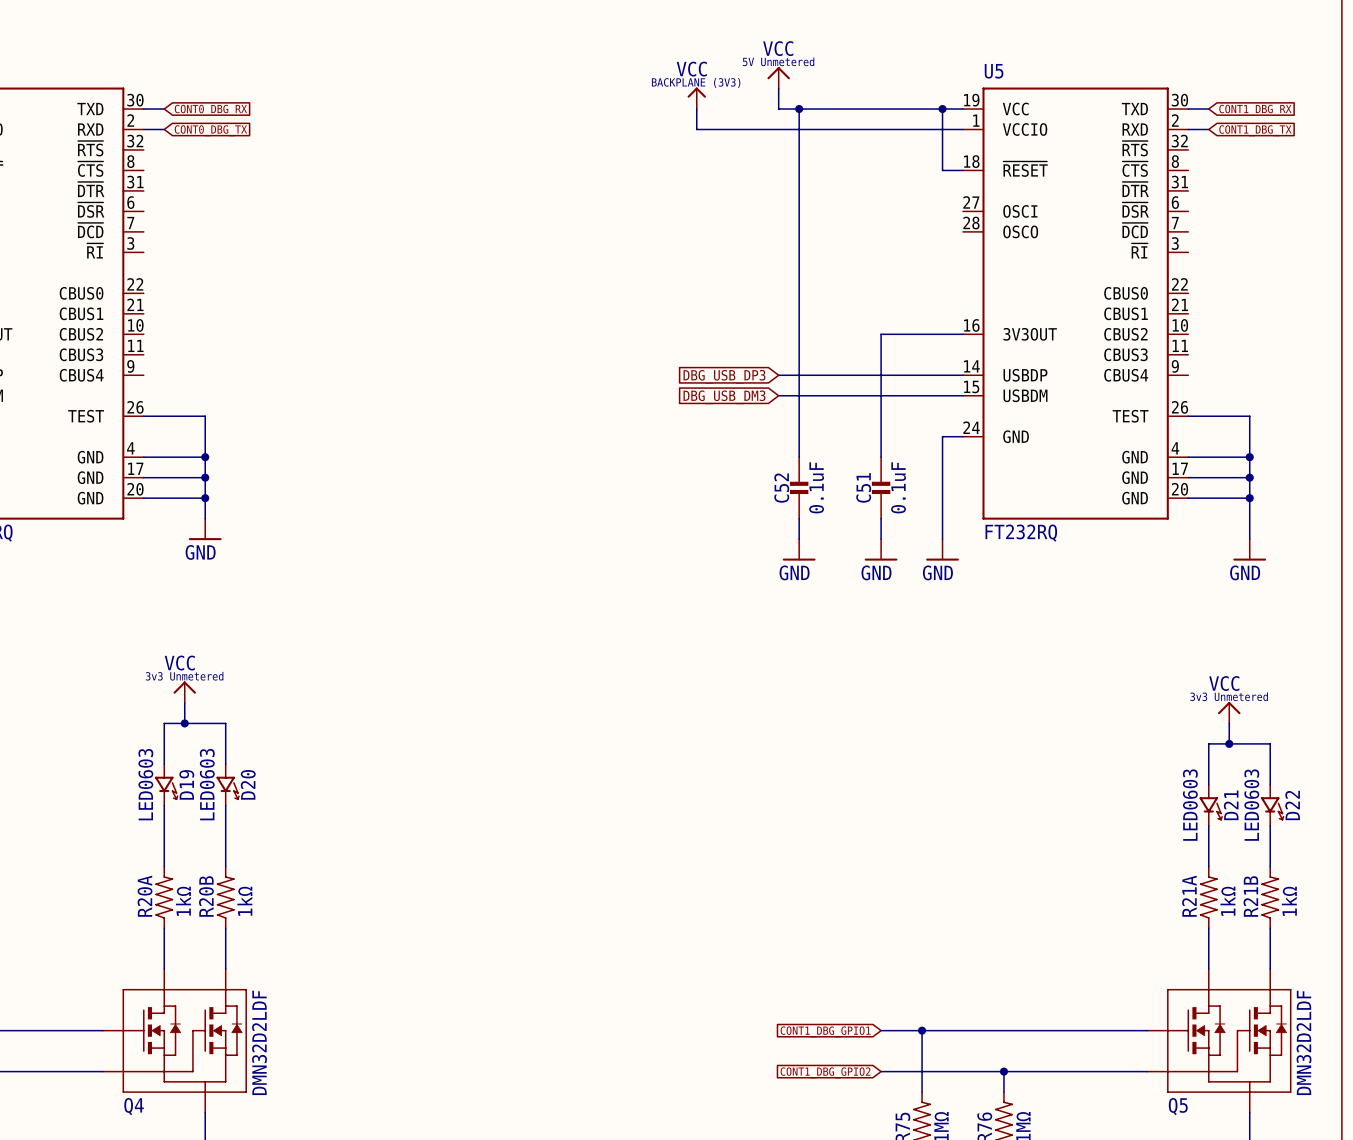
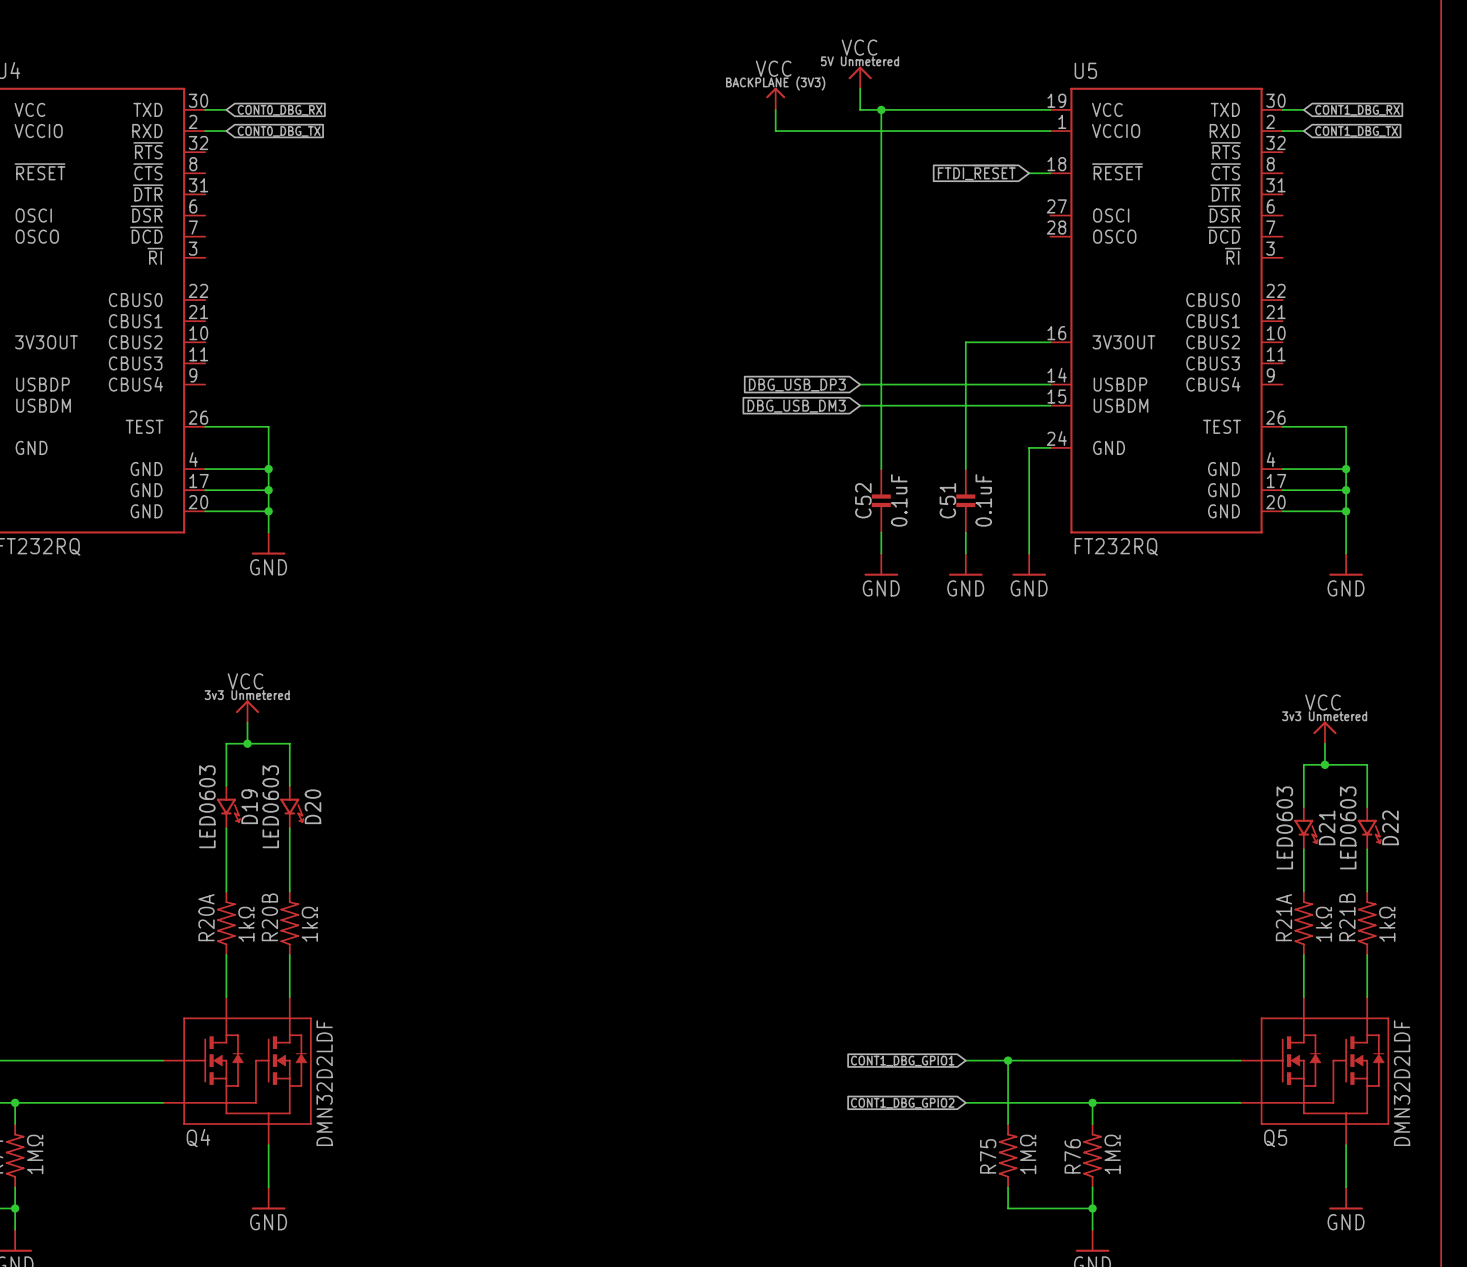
wire: (942, 109) (942, 170) -> none
junction: (942, 109) -> none
global label: none -> FTDI_~{RESET} (976, 172)

